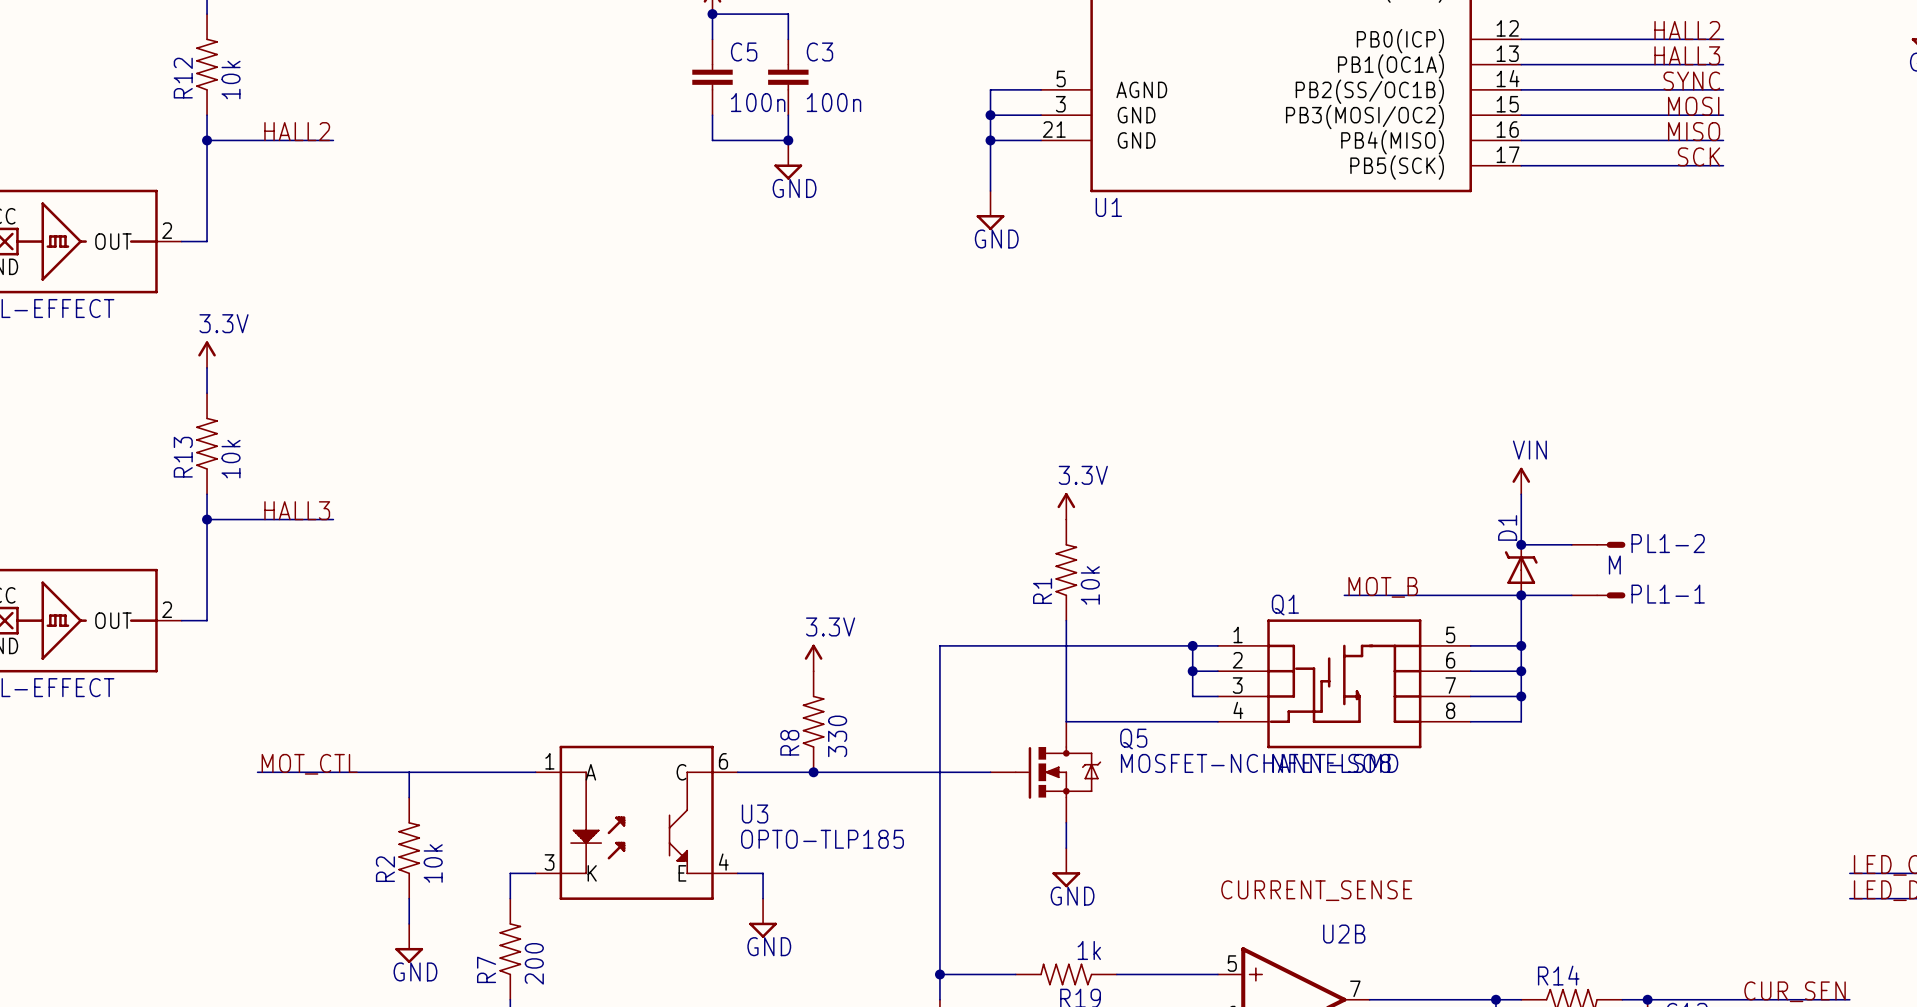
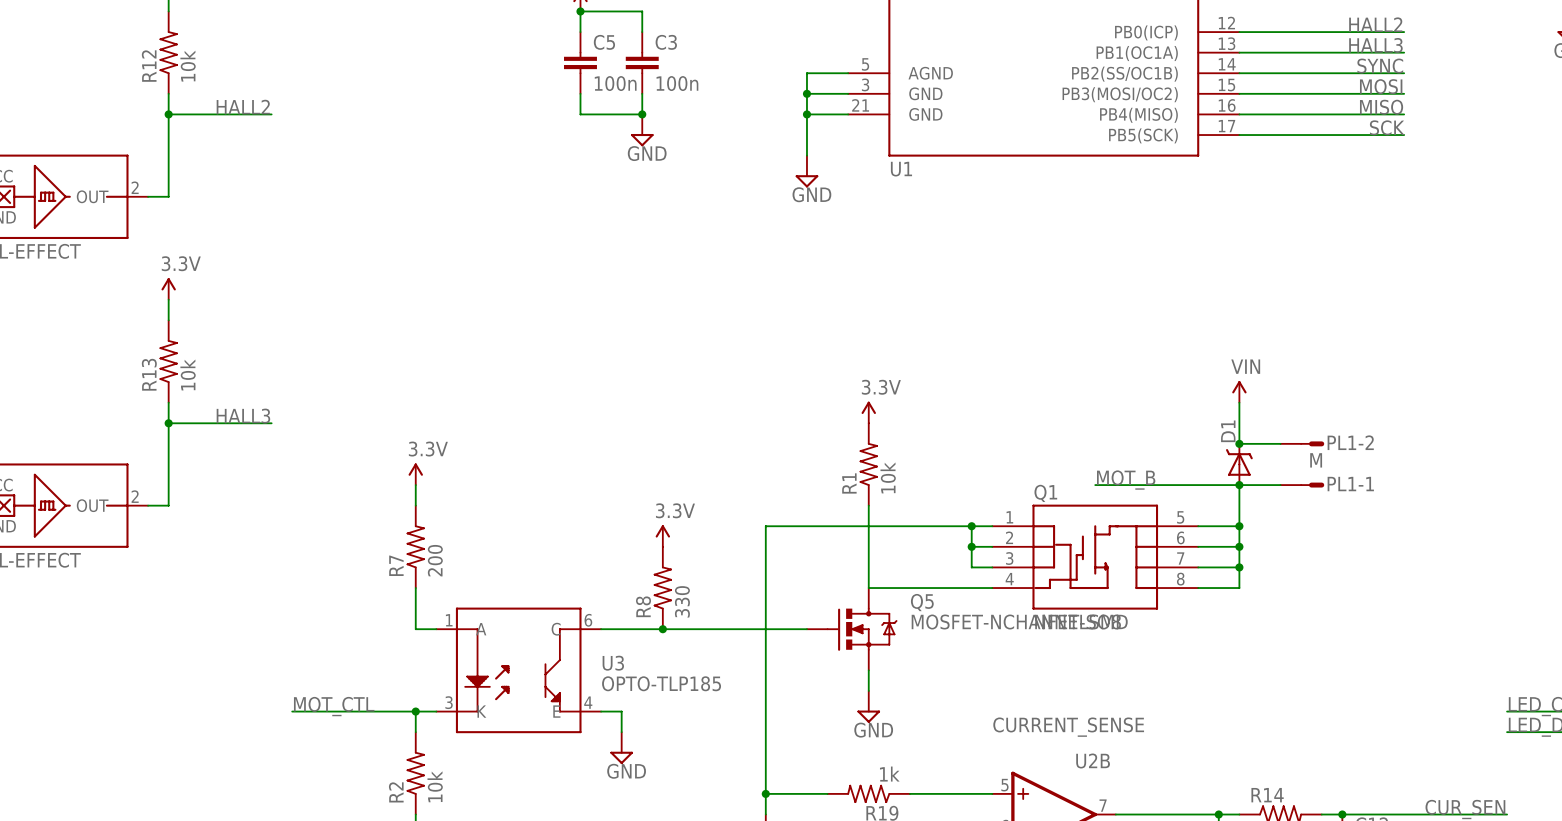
power symbol: none -> 3.3V (415, 474)
R7: none -> 200 (415, 546)
label position: MOT_CTL (309, 764) -> MOT_CTL (334, 706)
wire: (257, 772) (510, 772) -> (415, 588) (415, 629)
wire: (409, 772) (409, 797) -> (415, 485) (415, 505)
R2: 10k (409, 848) -> none
wire: none -> (292, 711) (415, 711)
junction: none -> (415, 711)
wire: (409, 898) (409, 923) -> none
power symbol: GND (409, 943) -> none
R7 value: 200 (534, 963) -> 10k (435, 786)
R7 name: R7 (486, 969) -> R2 (396, 792)

